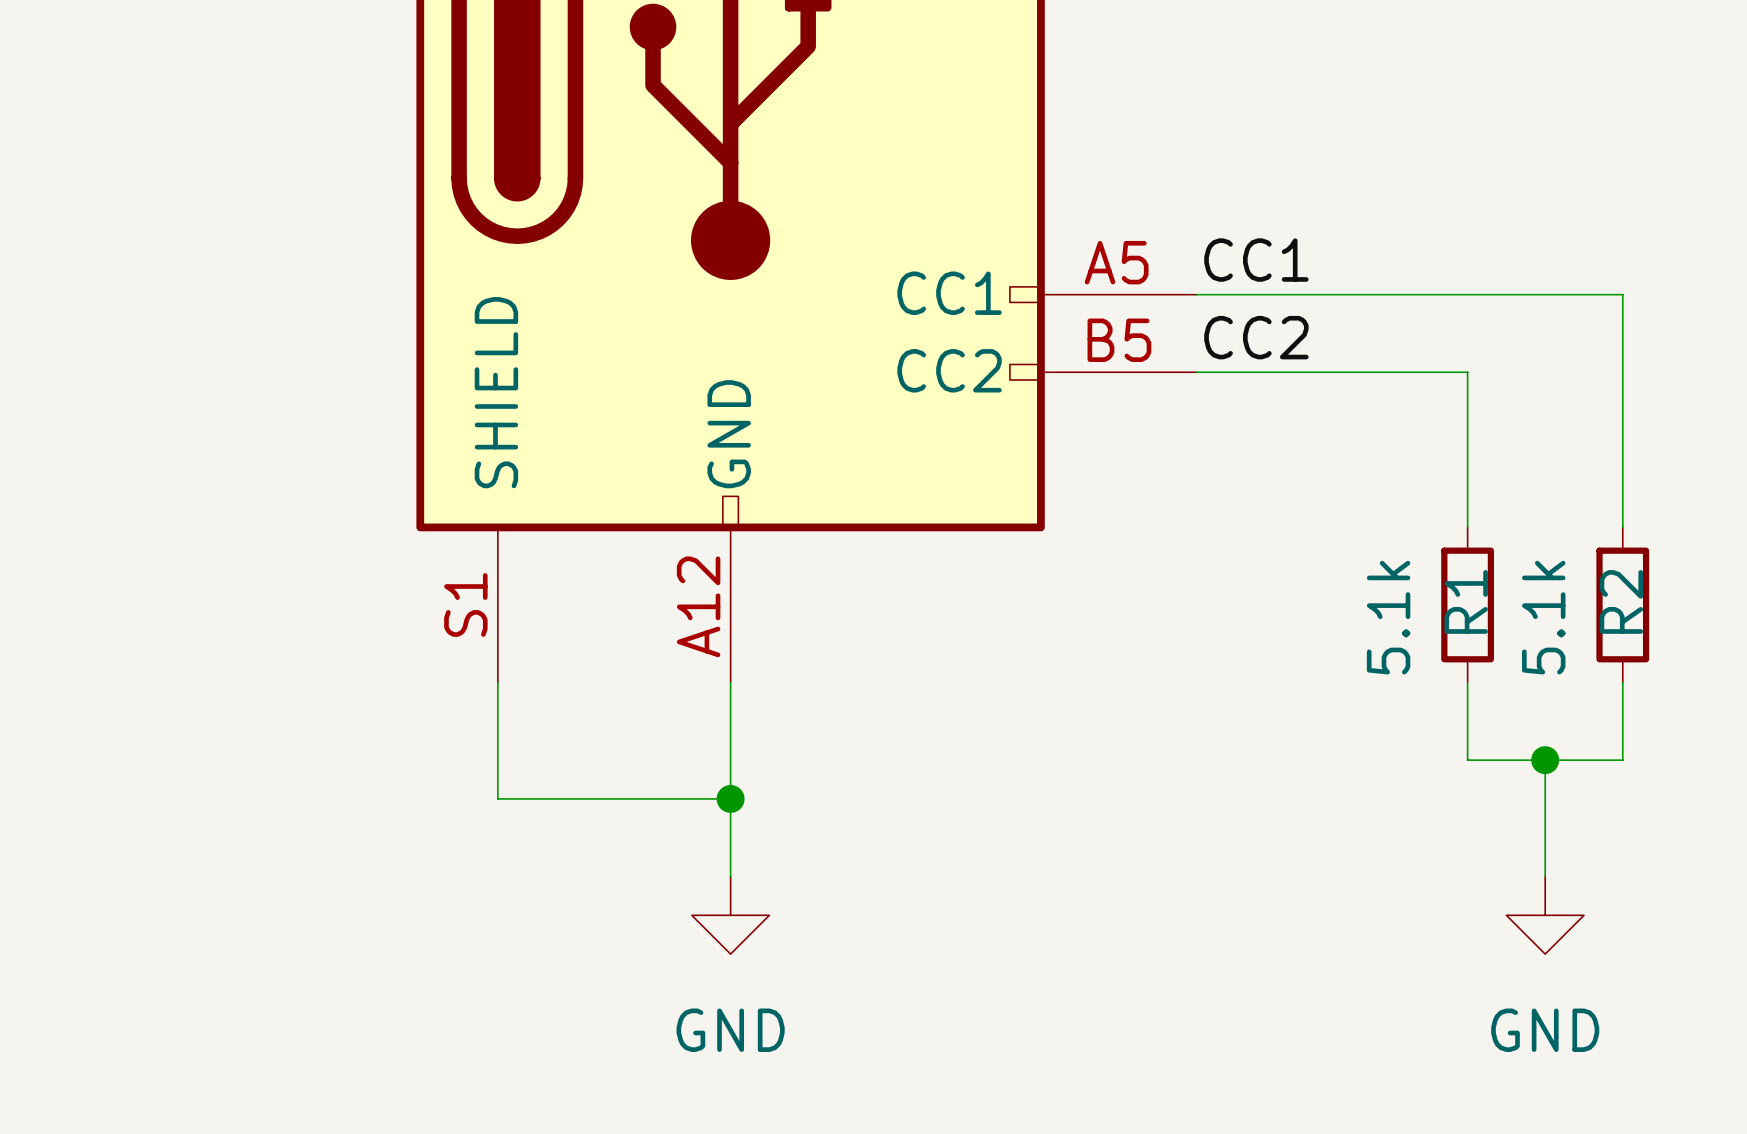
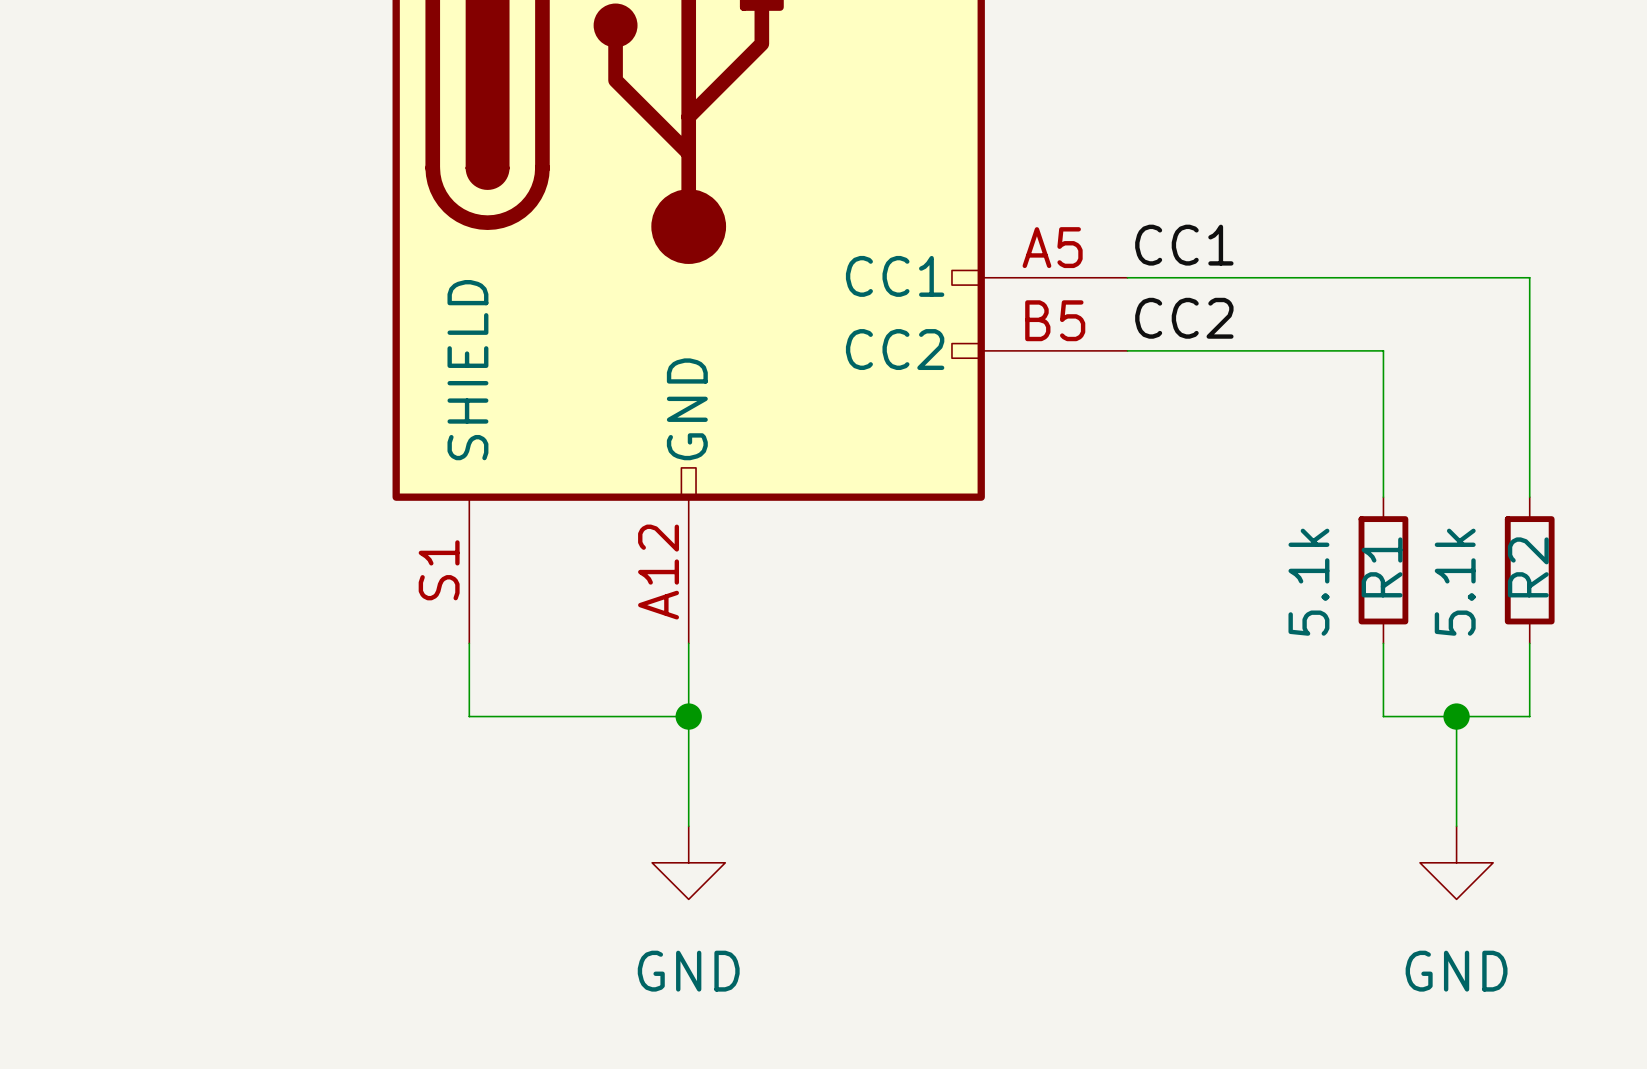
wire: (497, 760) (497, 798) (730, 798) -> (469, 716) (688, 716)
junction position: (730, 798) -> (688, 716)

